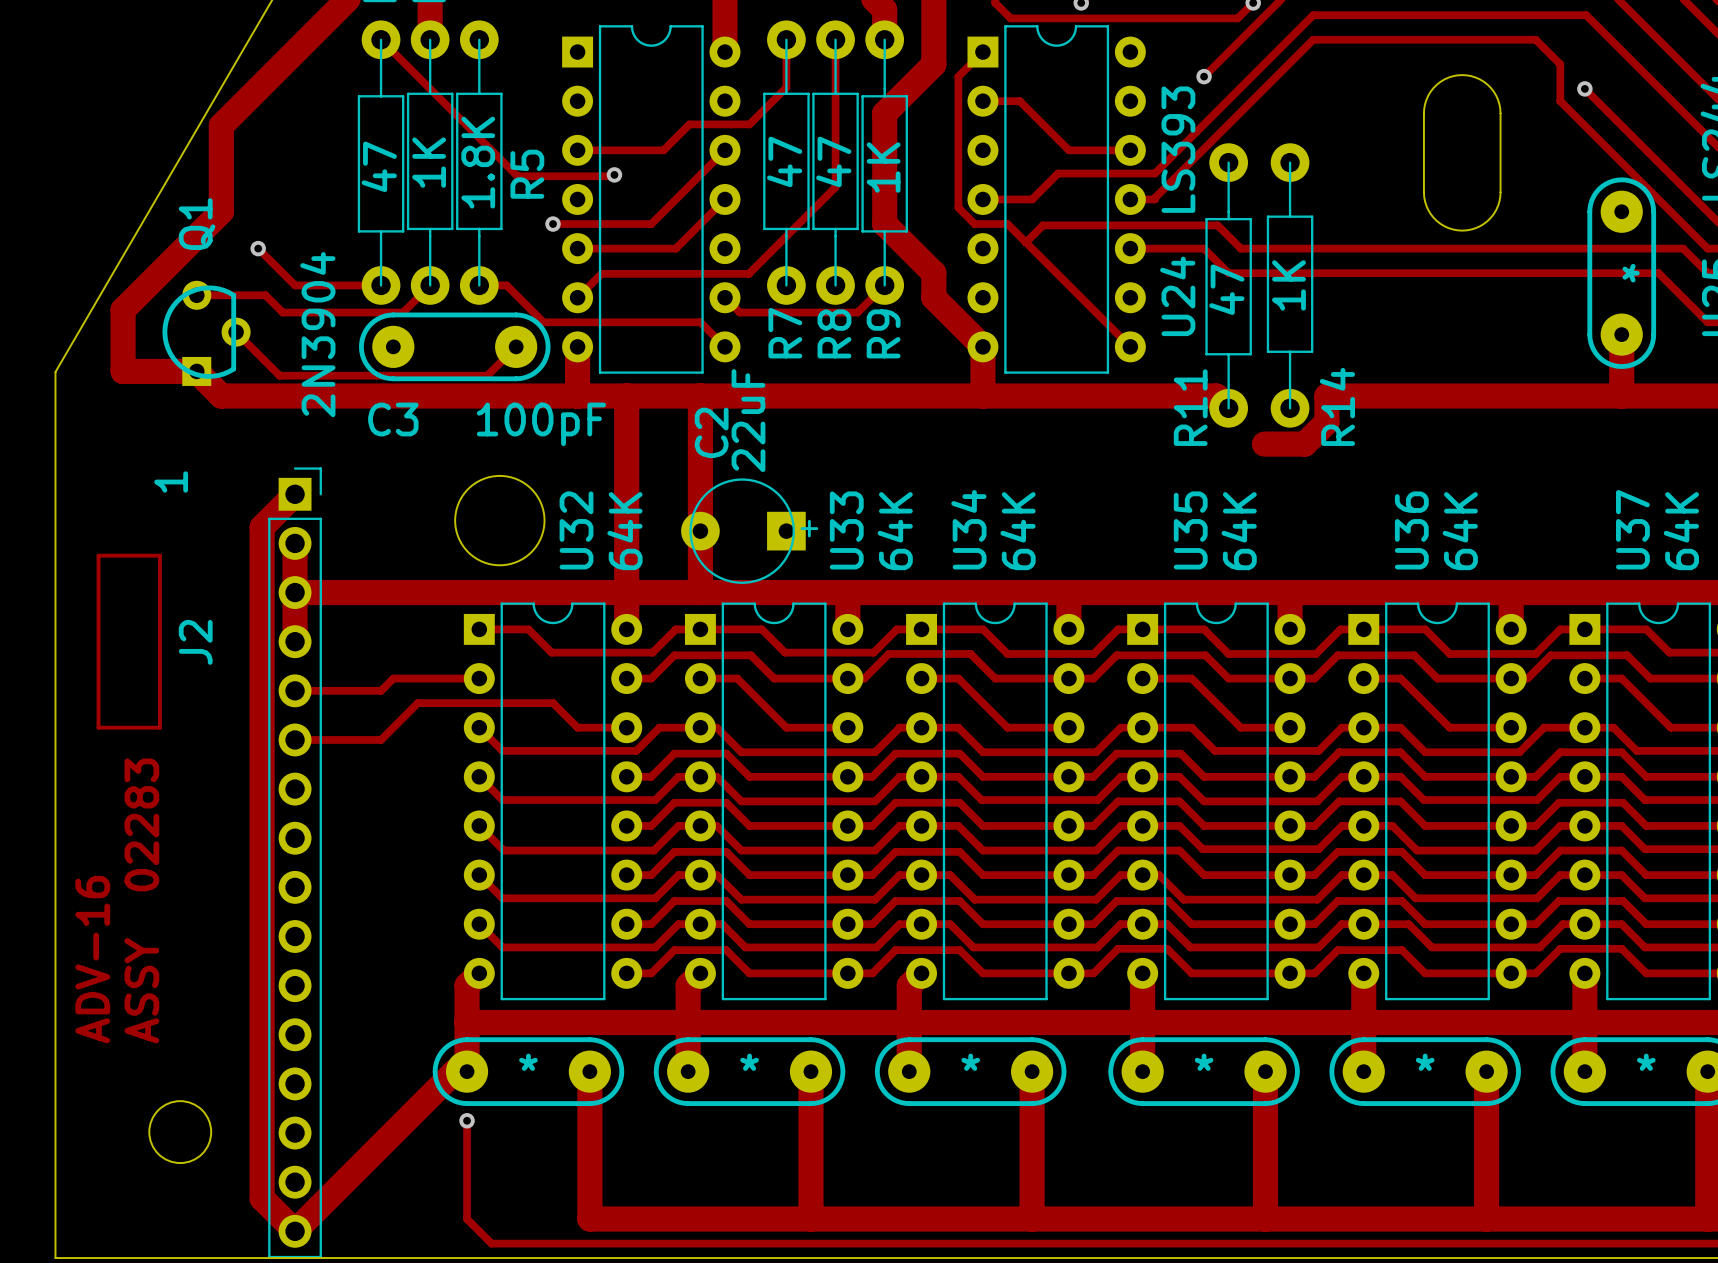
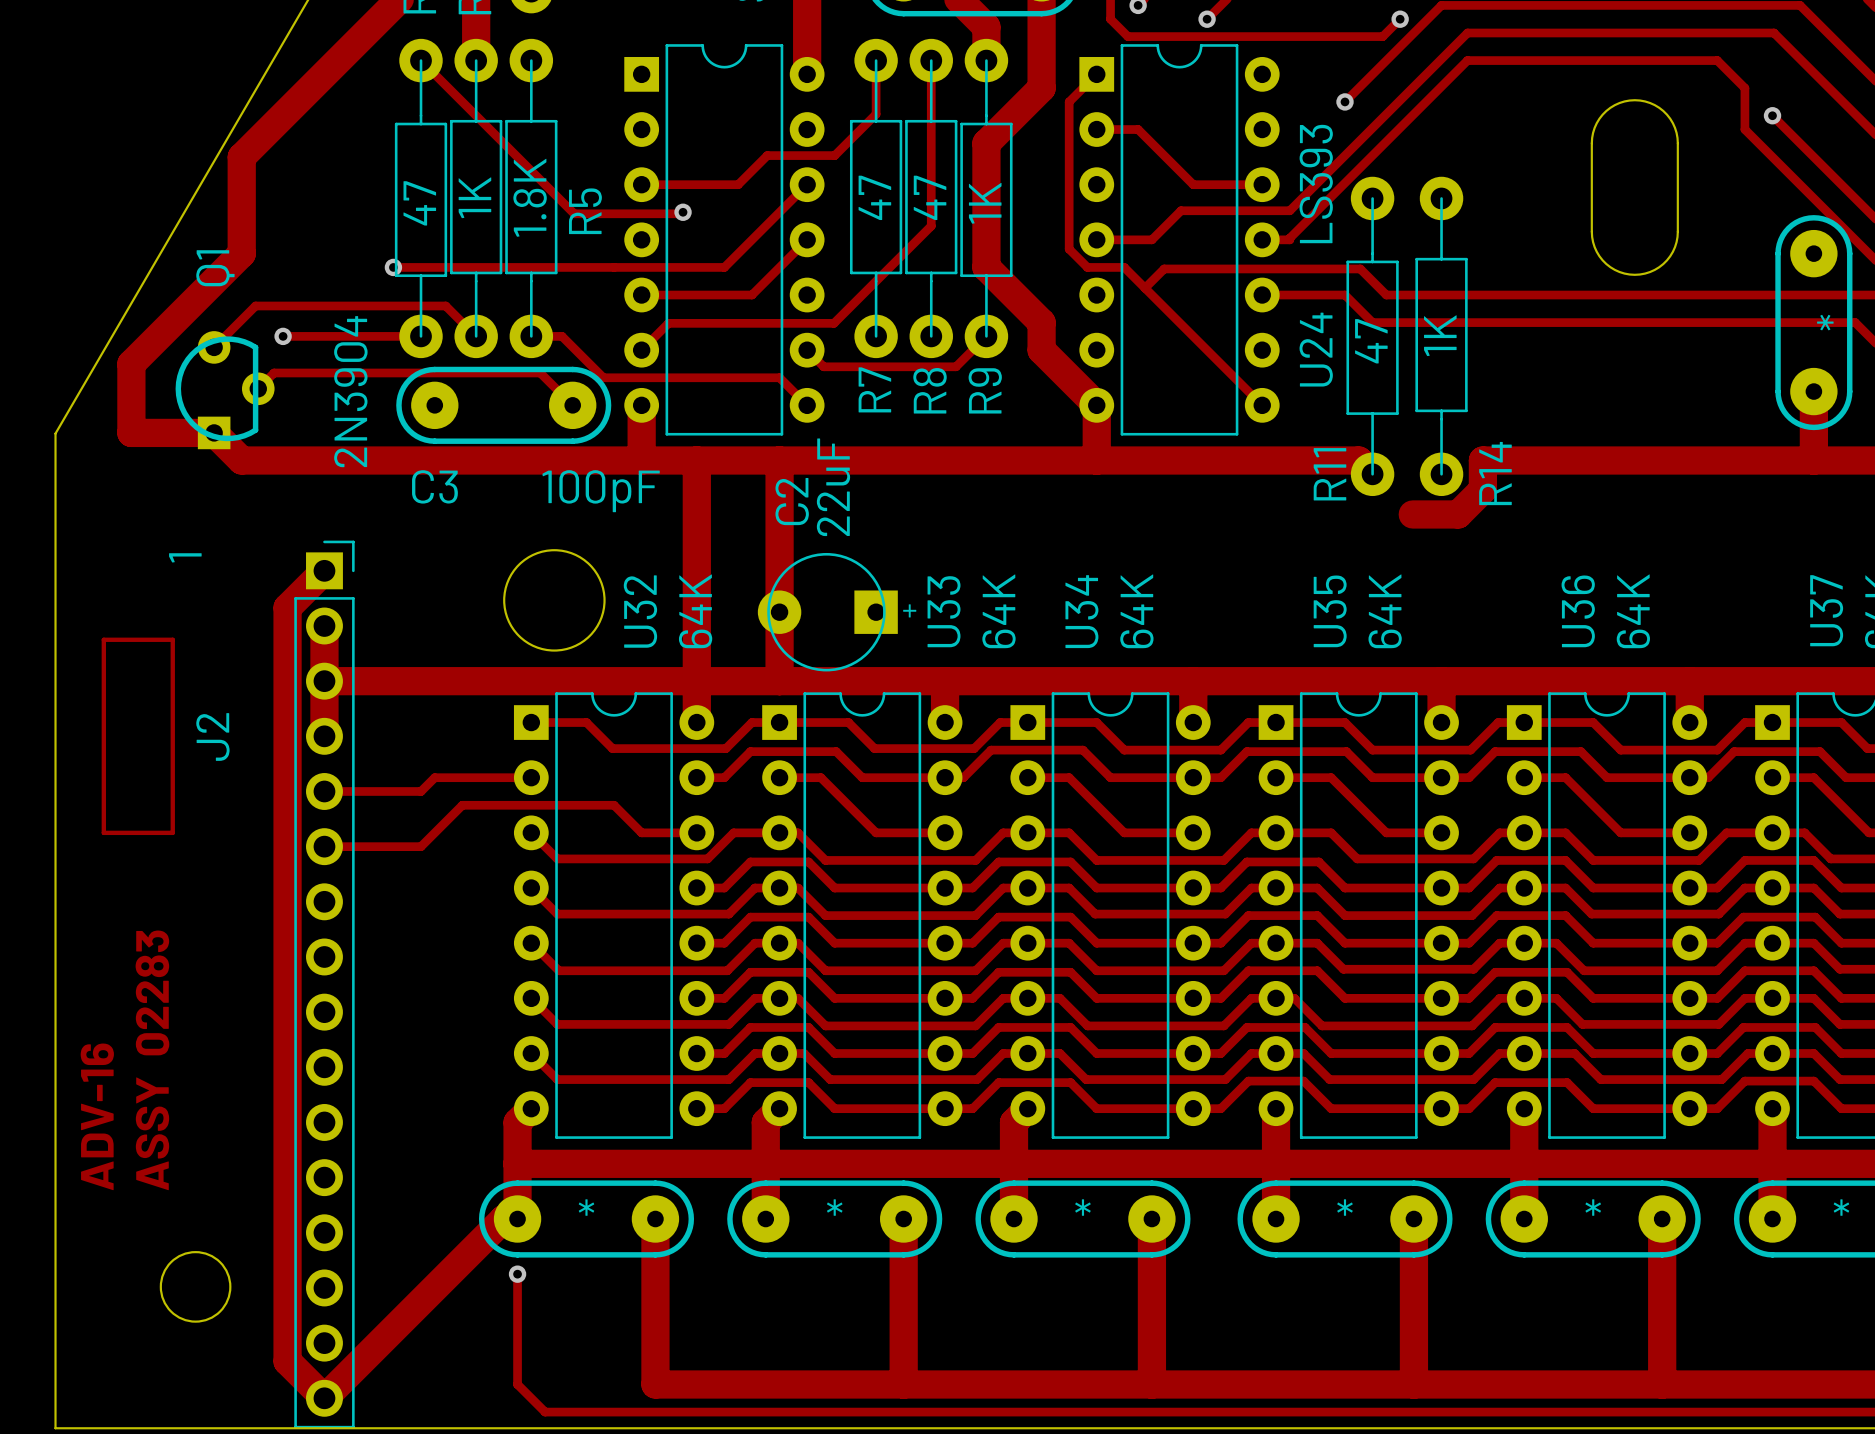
track: none -> (393, 267) (614, 267)
via: none -> (393, 267)
via: (553, 224) -> none
track: (258, 248) (295, 285) -> (283, 336) (324, 336)
via position: (258, 248) -> (283, 336)
track: (430, 285) (403, 312) (282, 312) (265, 295) (196, 295) -> (476, 336) (445, 305) (255, 305) (214, 347)
track: (236, 332) (279, 375) (487, 375) (516, 346) -> (258, 388) (274, 372) (540, 372) (572, 405)

